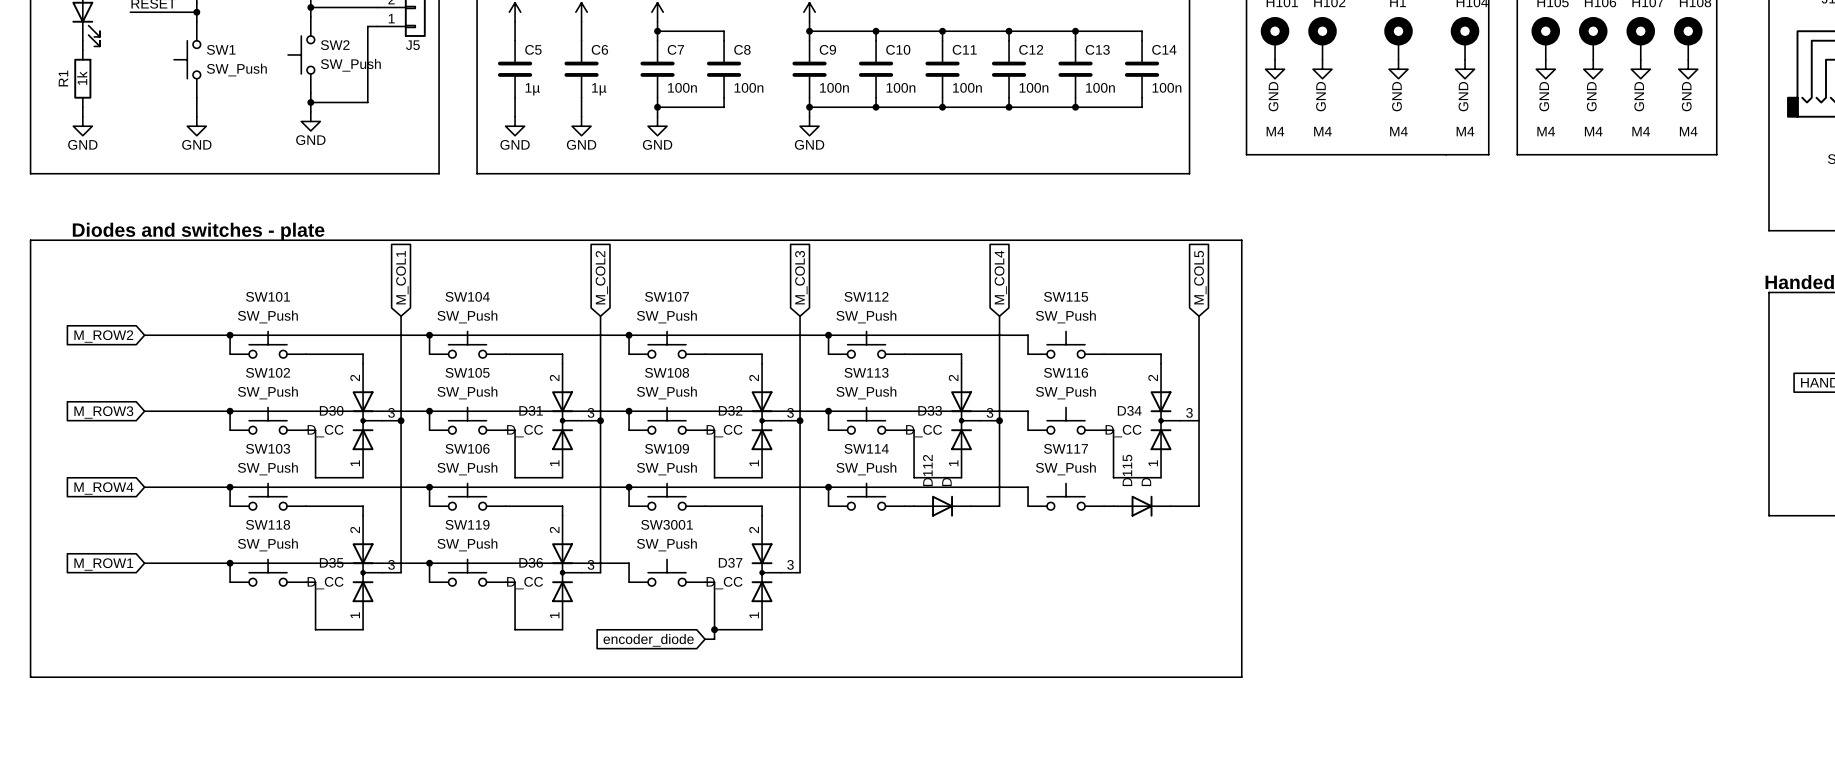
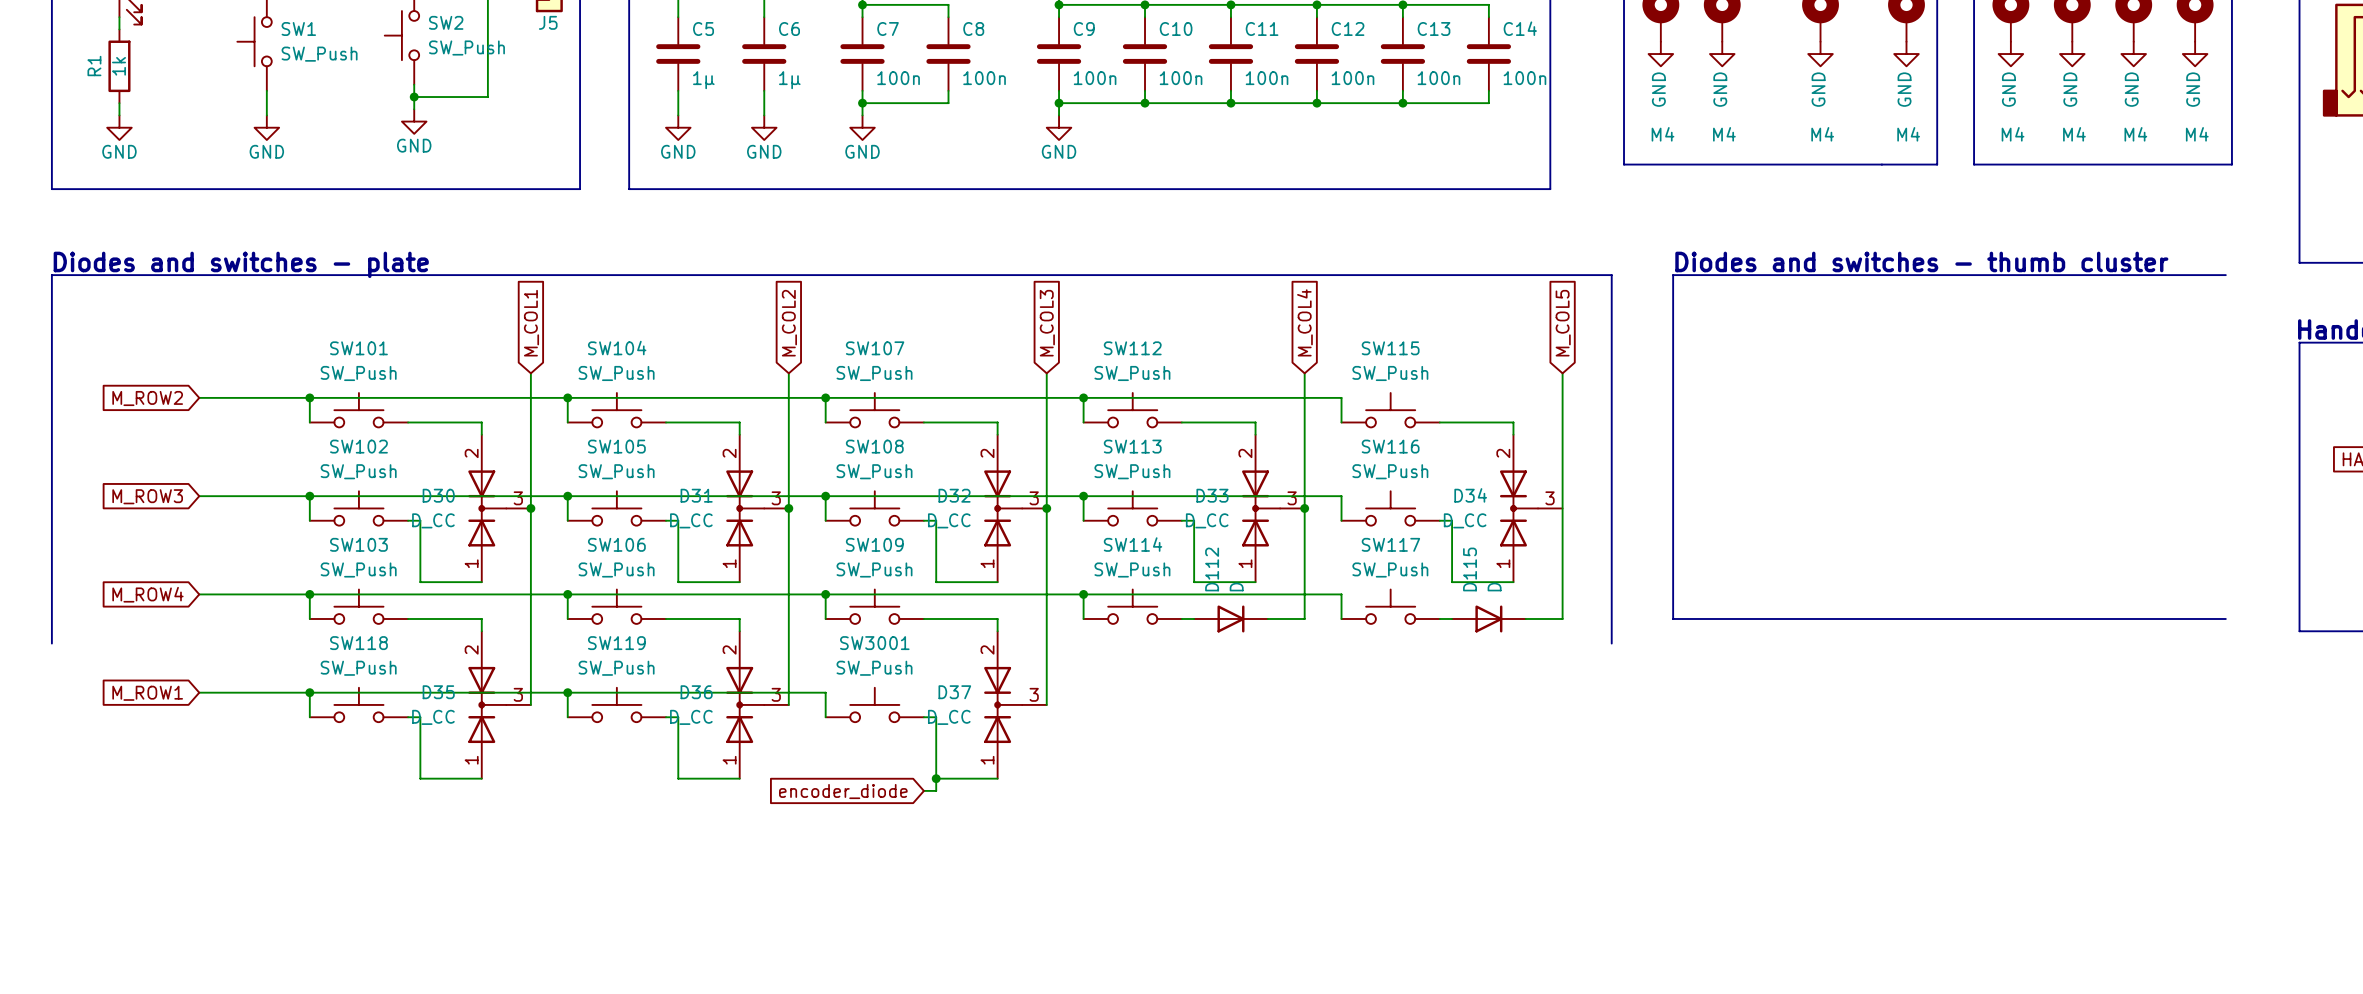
text: none -> Diodes and switches - thumb cluster (1921, 261)
line: (1237, 240) (1241, 240) (1241, 677) (30, 677) (30, 525) -> (1611, 275) (1611, 643)
line: none -> (2225, 275) (1673, 275) (1673, 618) (2225, 618)

